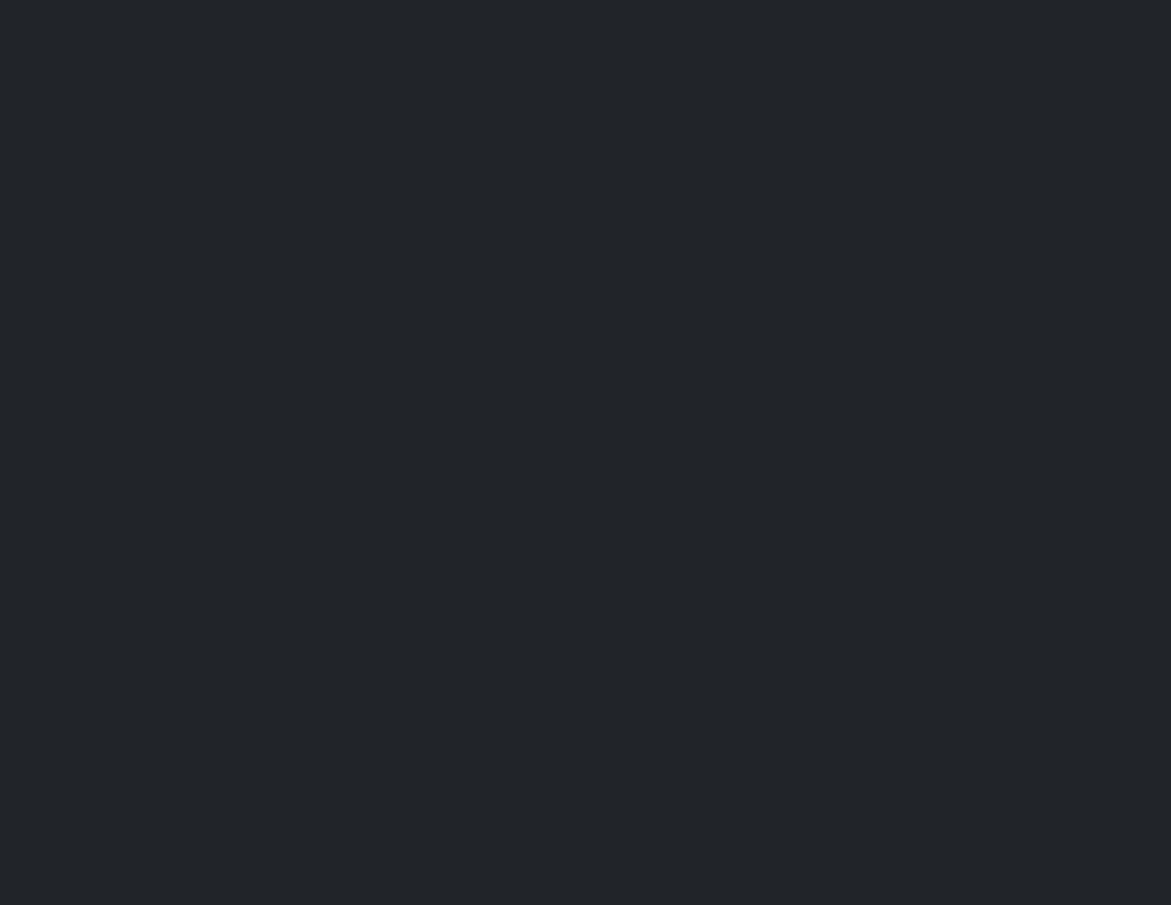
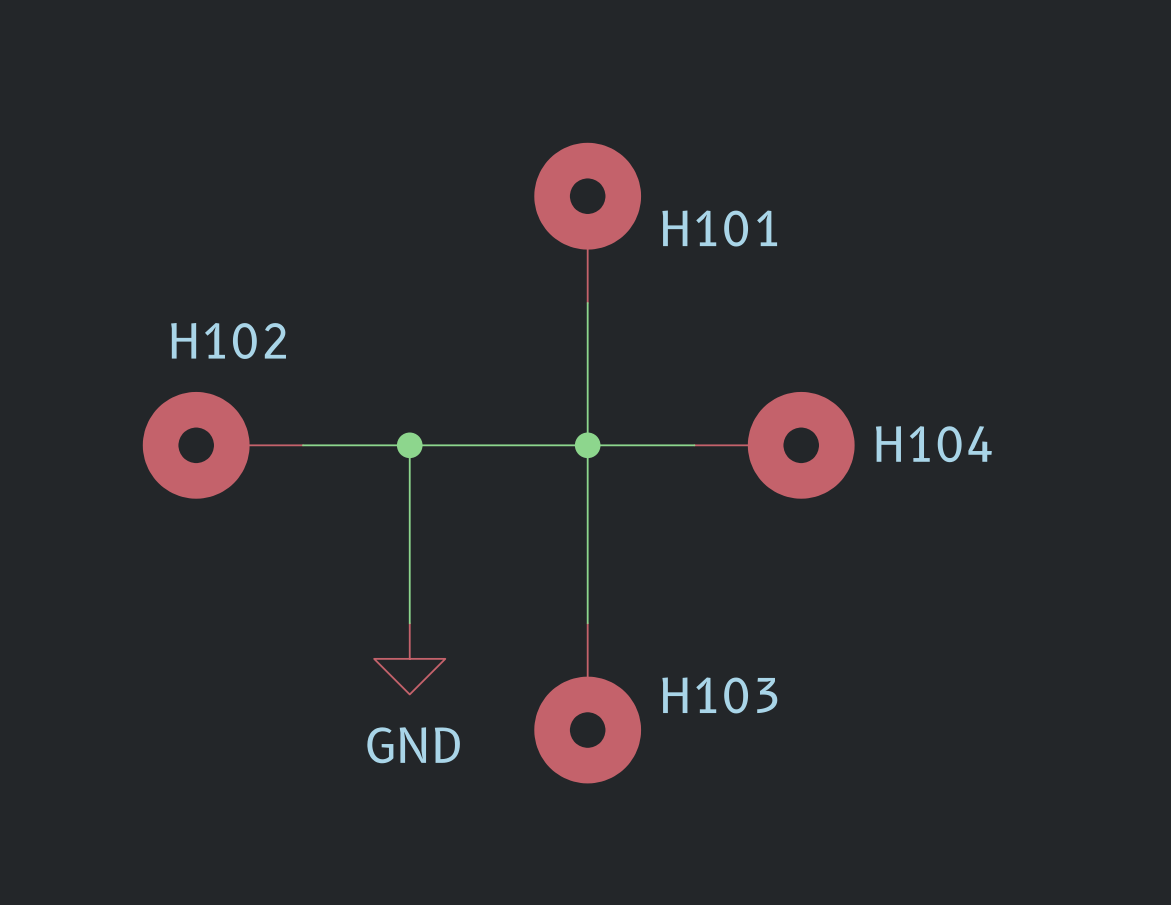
H101: none -> (587, 222)
wire: none -> (587, 302) (587, 623)
H102: none -> (222, 445)
wire: none -> (302, 445) (694, 445)
wire: none -> (409, 445) (409, 623)
junction: none -> (409, 445)
junction: none -> (587, 445)
H104: none -> (774, 445)
power symbol: none -> GND (409, 658)
H103: none -> (587, 703)

